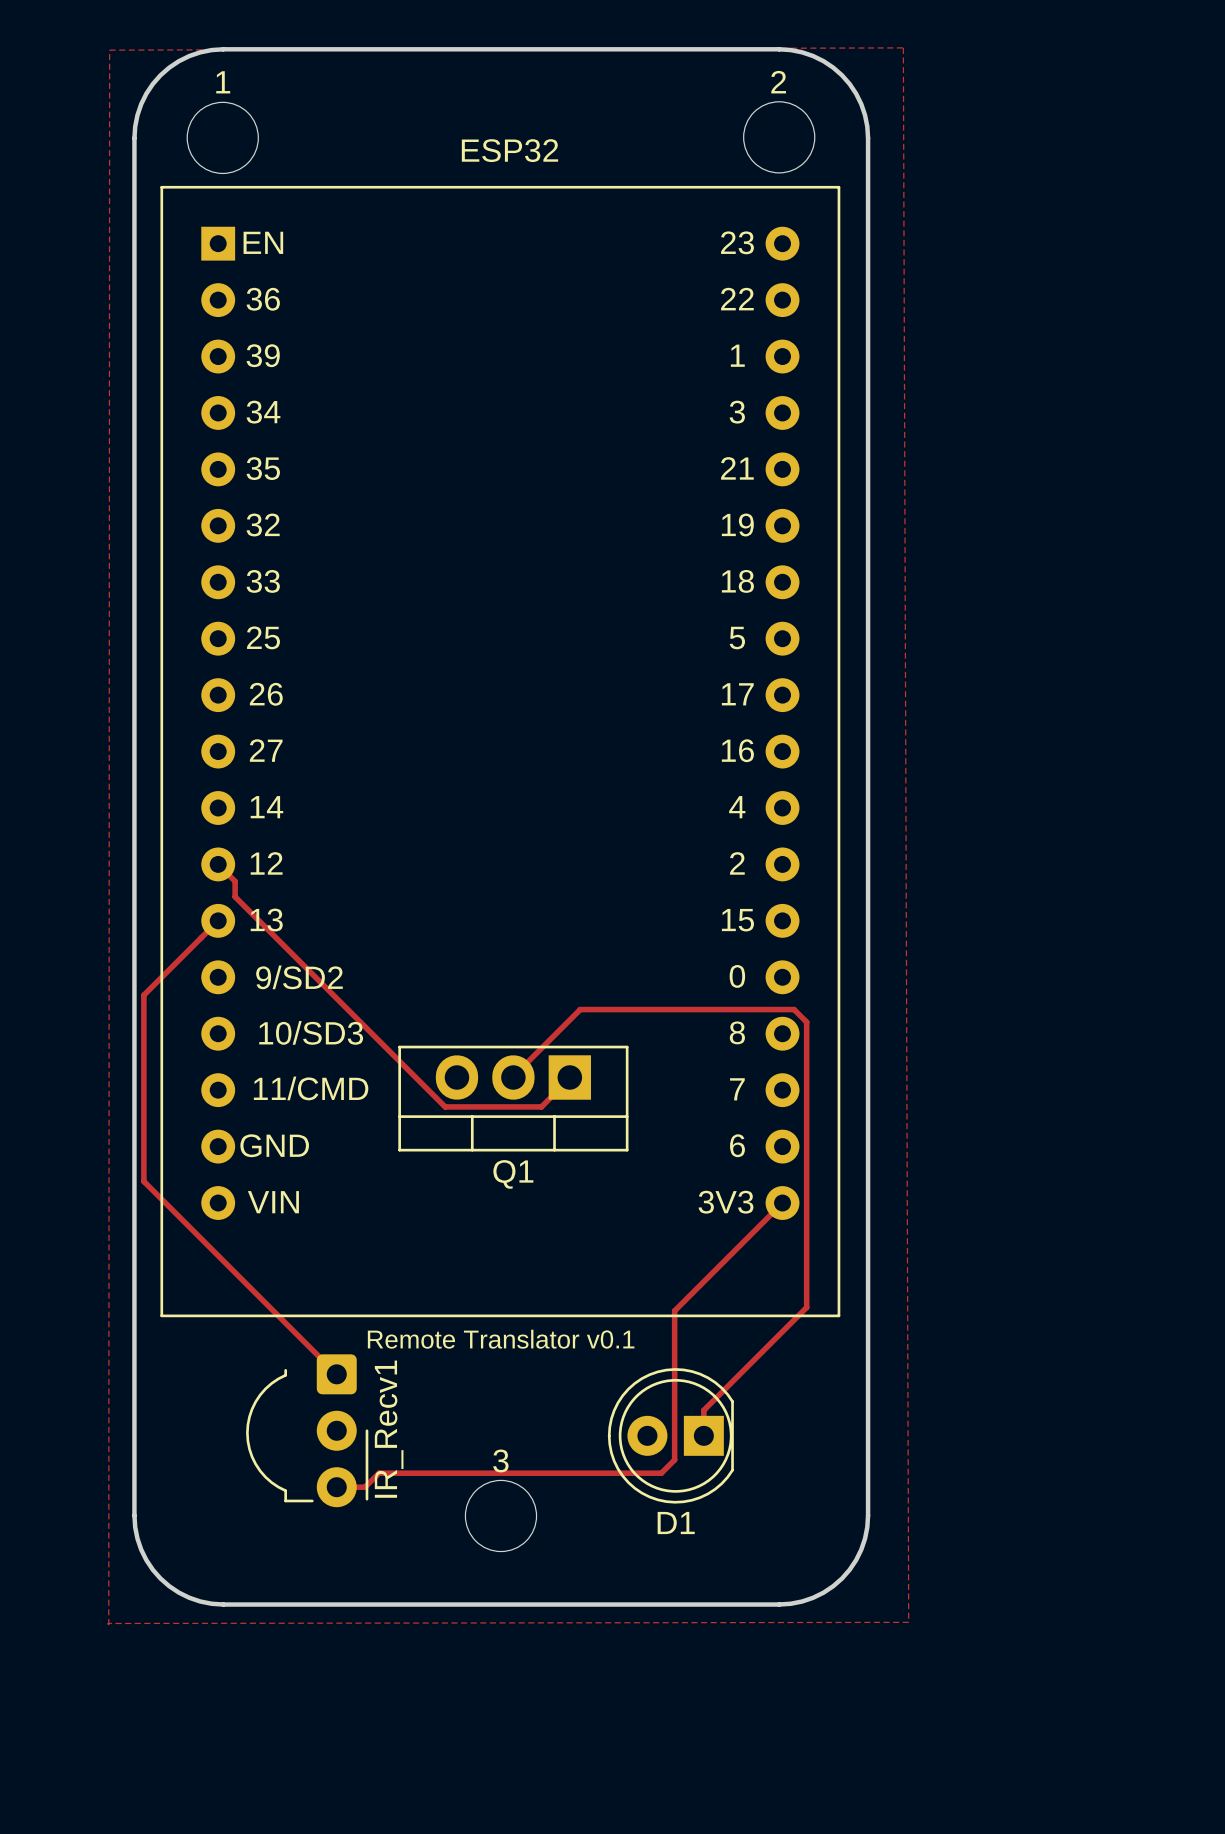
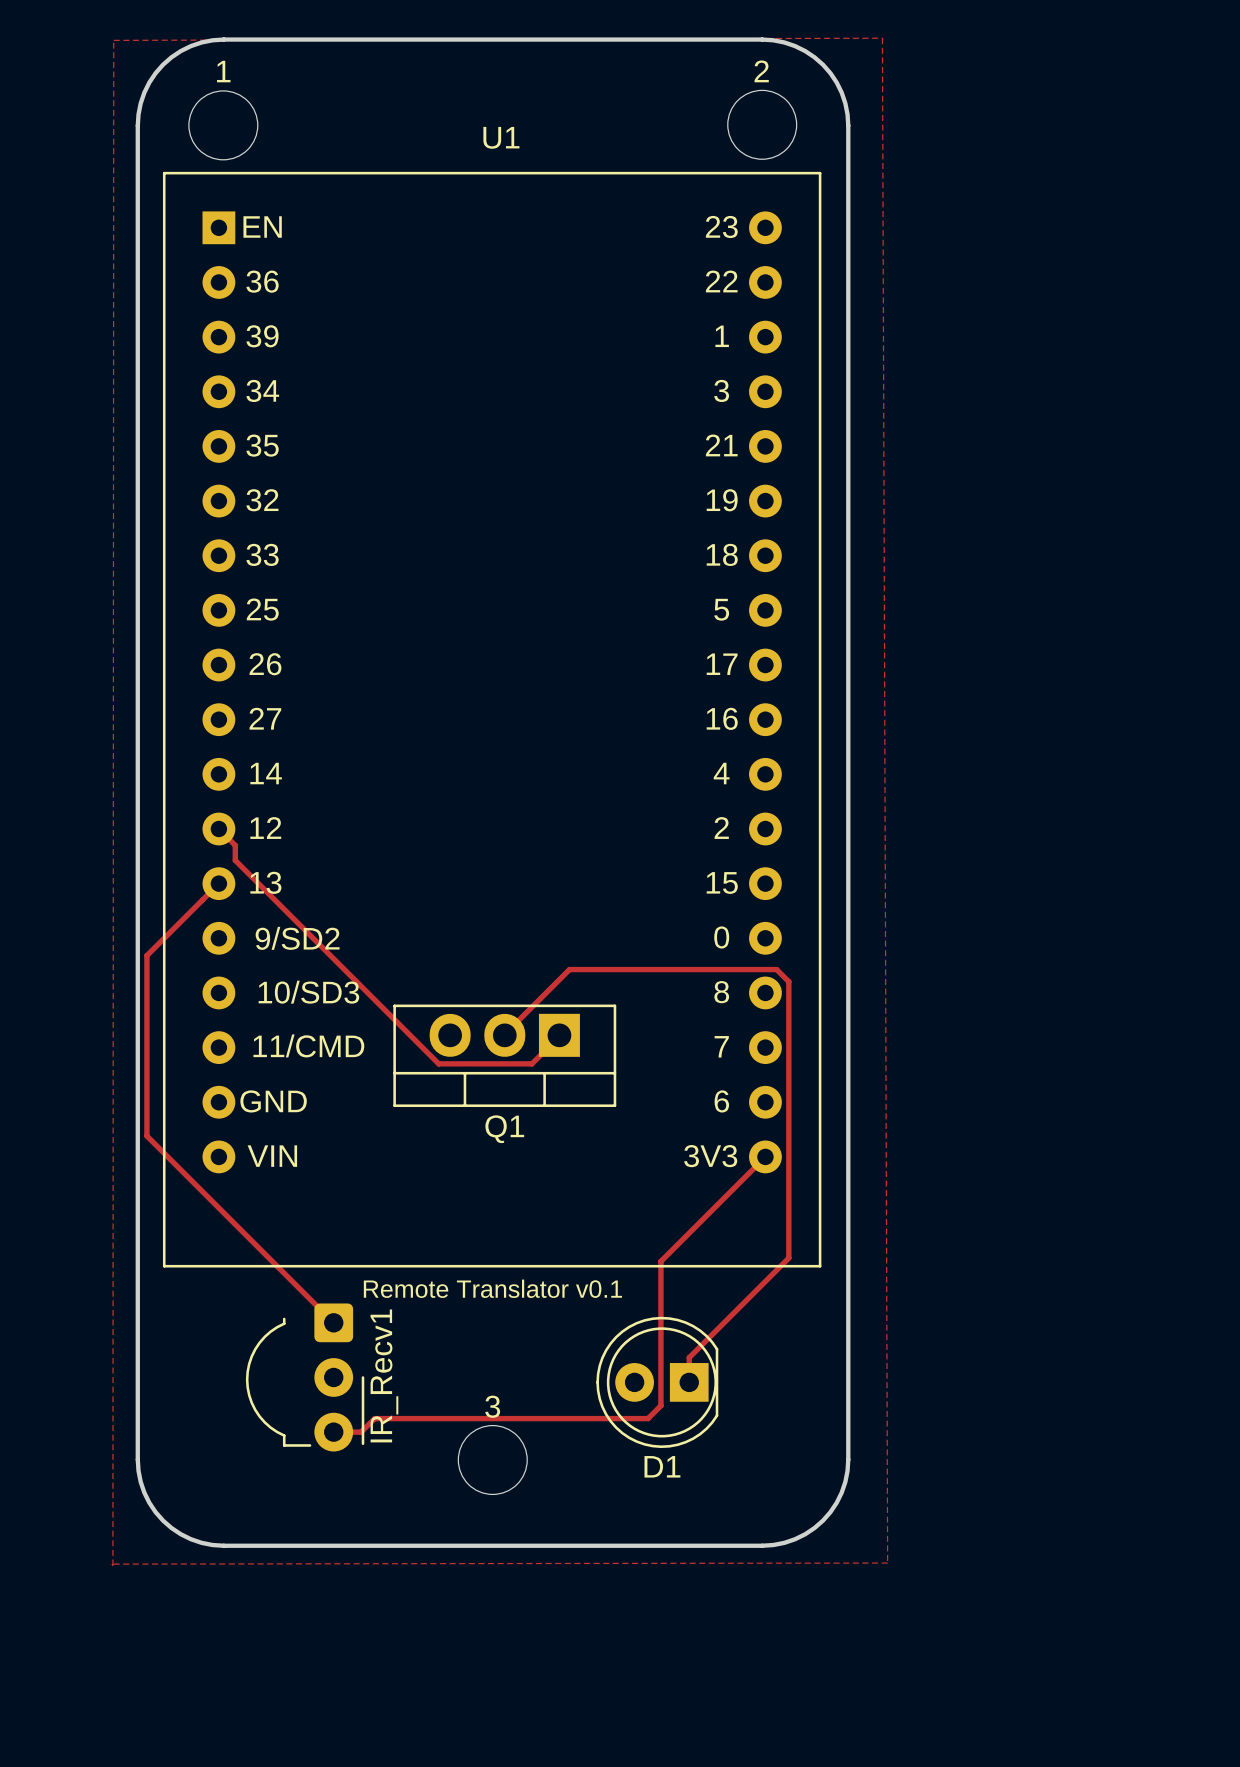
ESP32 name: ESP32 (509, 150) -> U1 (501, 137)

